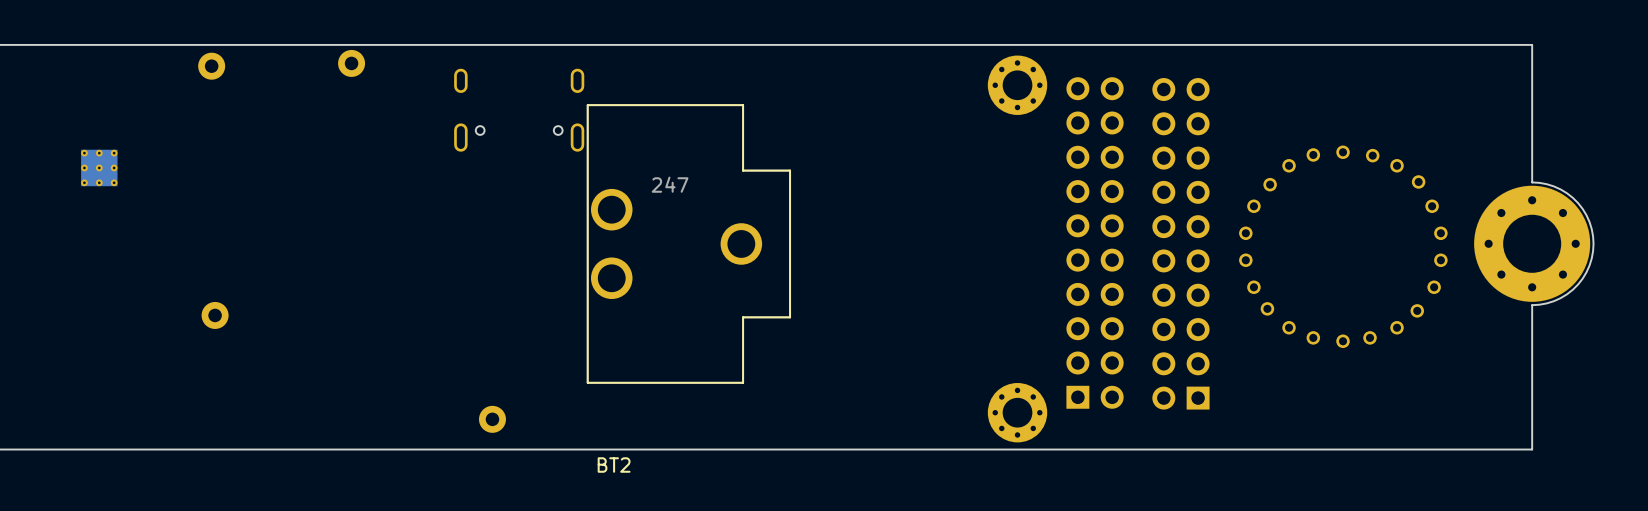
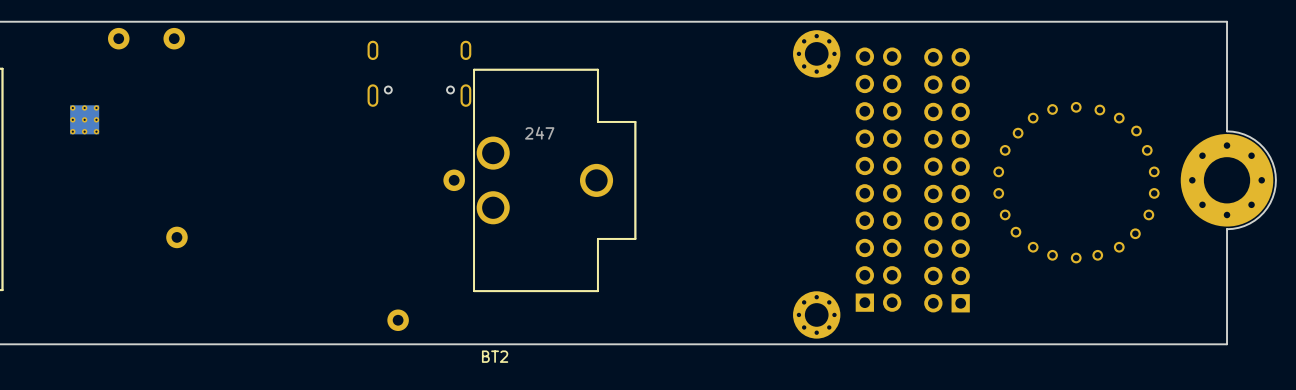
part: (351, 63) -> none
part: none -> (118, 38)
part: none -> (454, 180)

